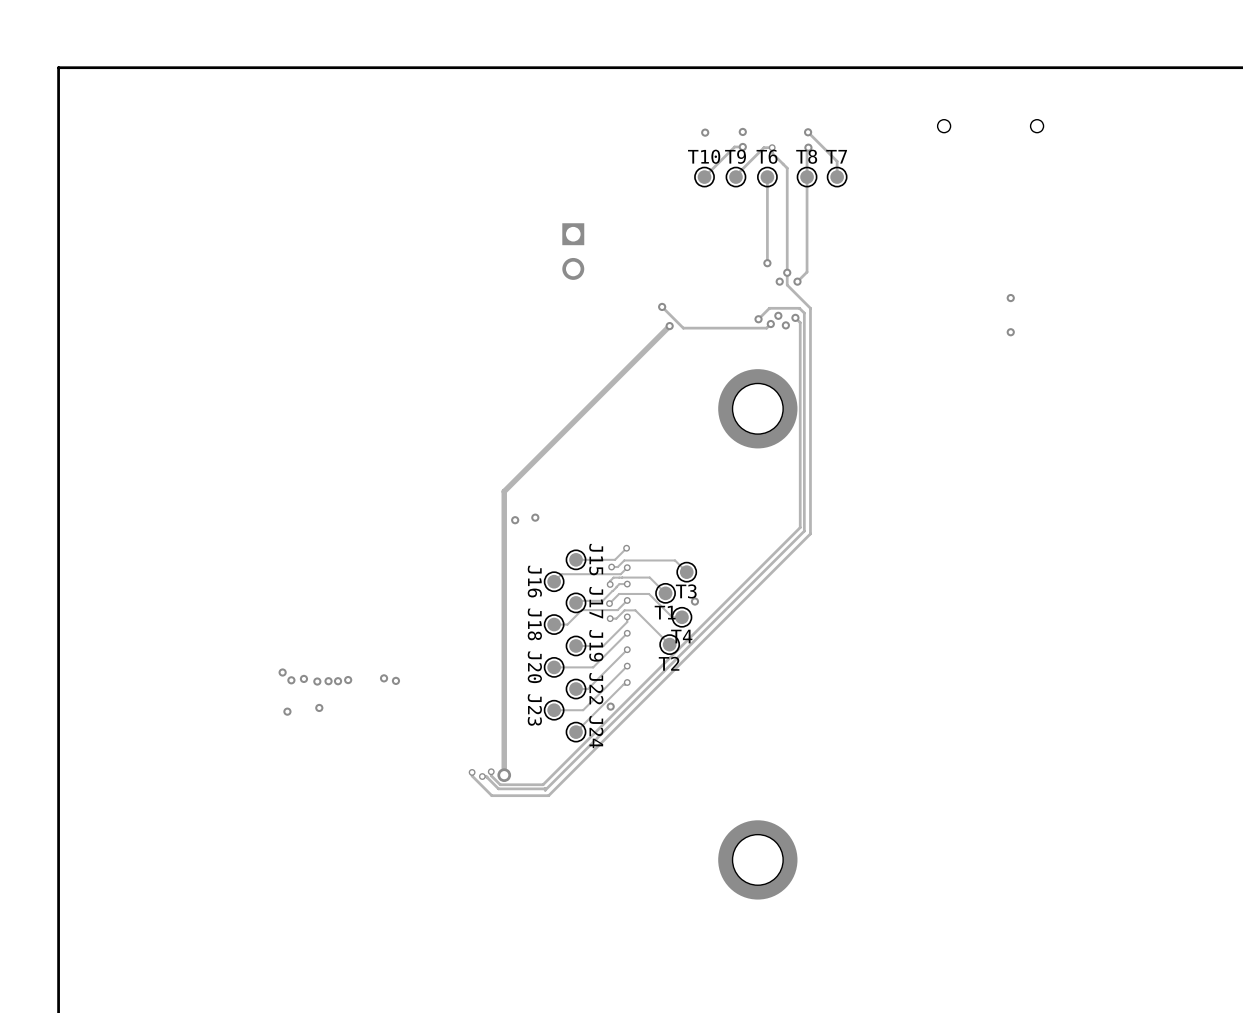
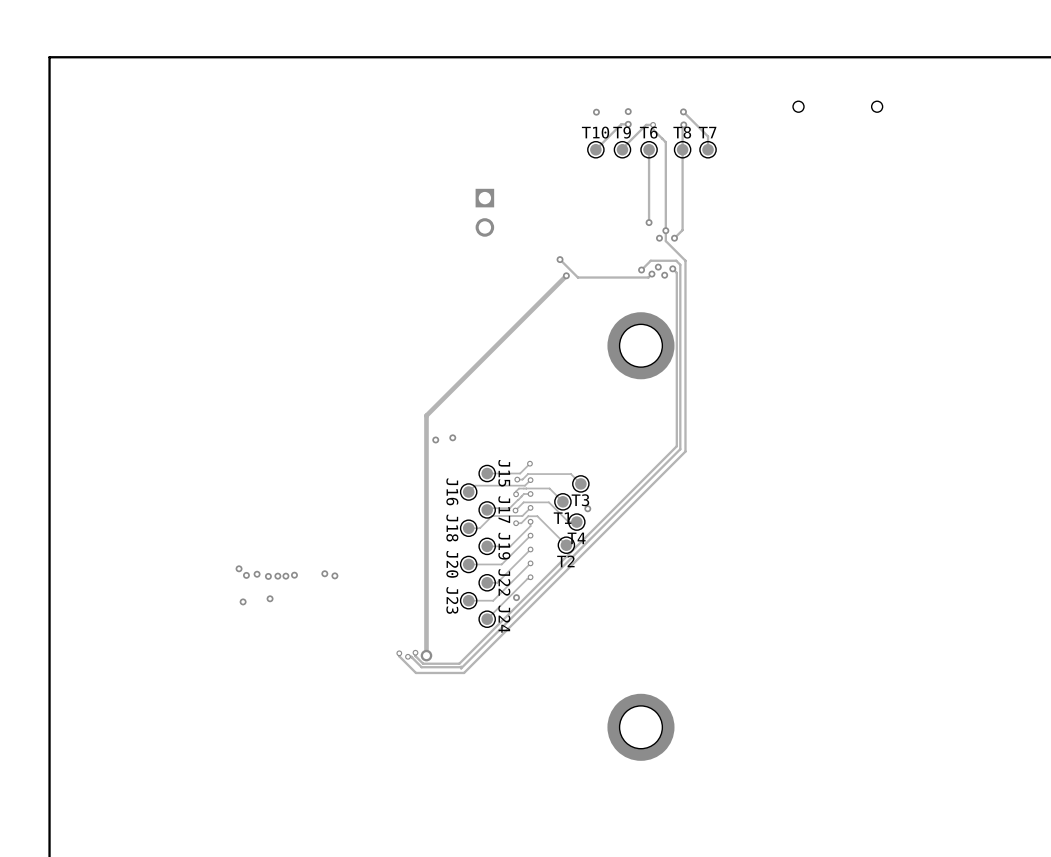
via: (1010, 298) -> none
via: (1010, 332) -> none

